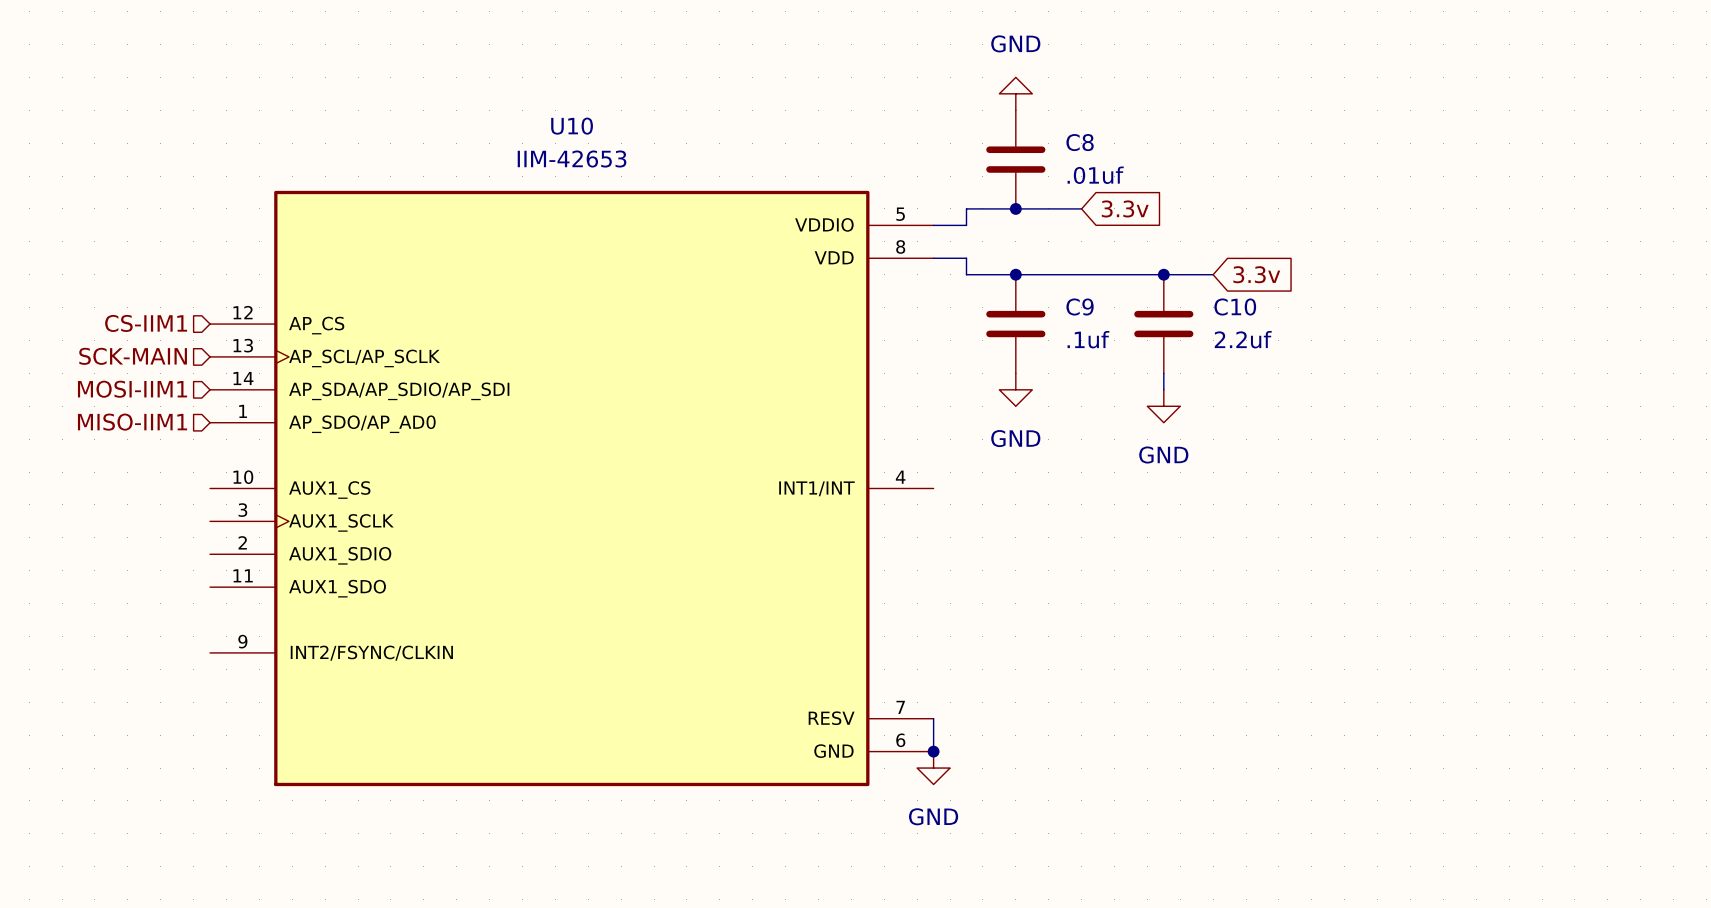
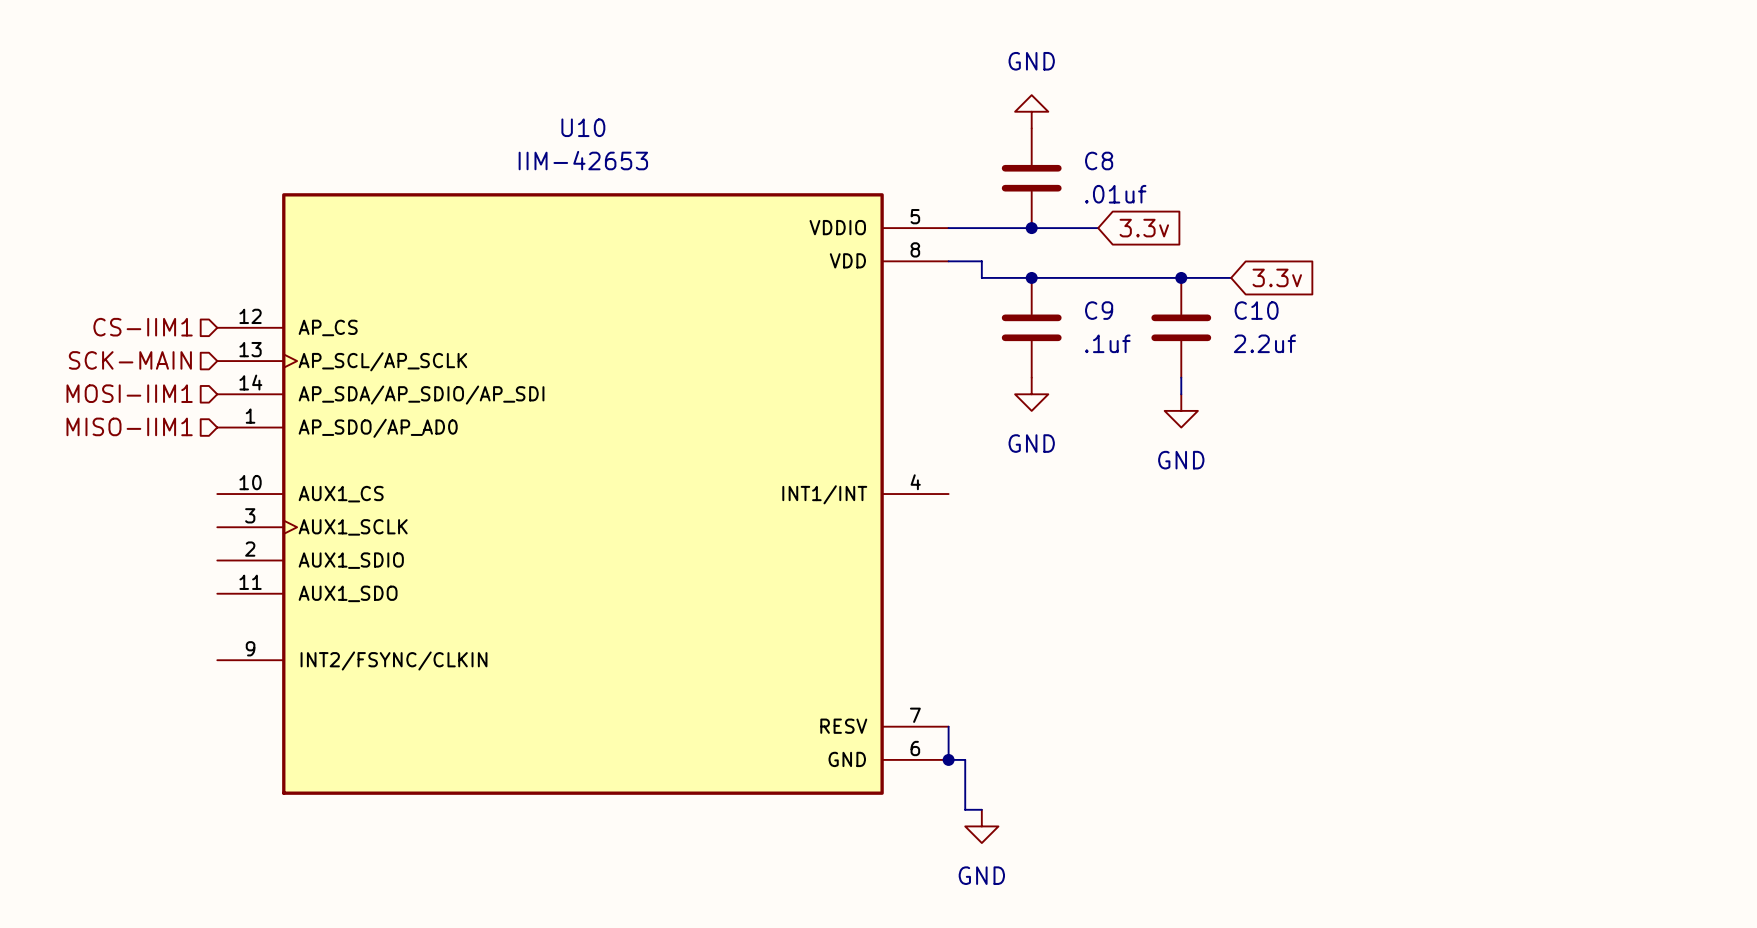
power symbol position: GND (1015, 93) -> GND (1031, 111)
C8 position: (1015, 159) -> (1031, 178)
junction position: (1015, 208) -> (1031, 228)
wire: (1081, 208) (966, 208) (966, 225) -> (1098, 228) (981, 228)
global label position: 3.3v (1125, 208) -> 3.3v (1144, 228)
wire: none -> (948, 759) (965, 759) (965, 809) (981, 809)
power symbol position: GND (933, 768) -> GND (981, 826)

